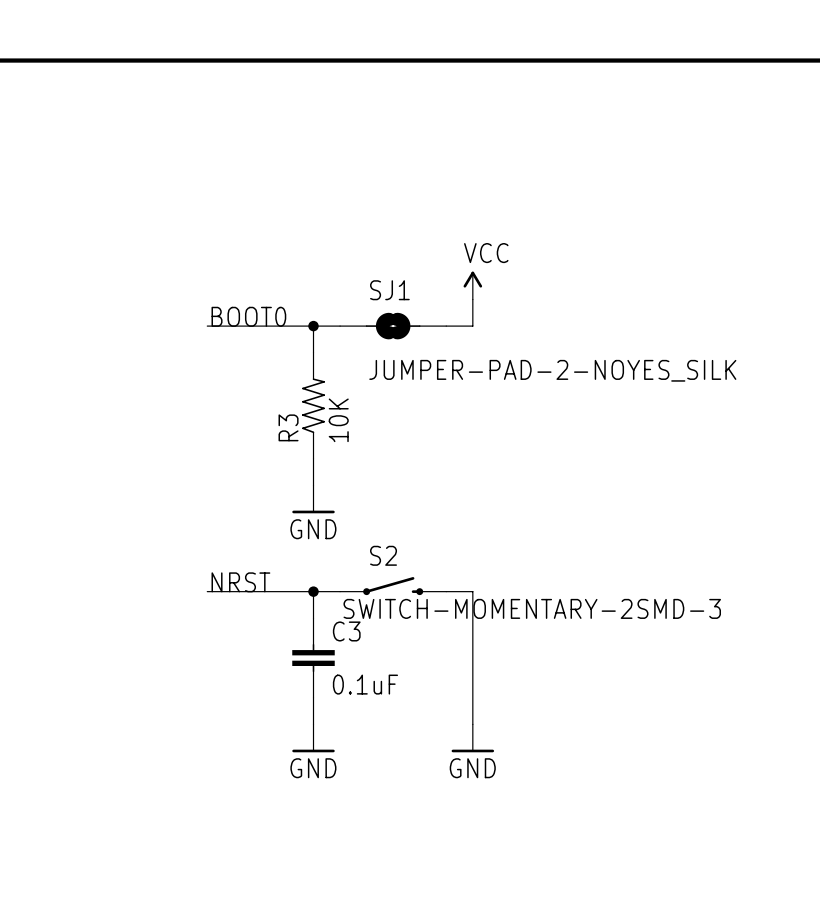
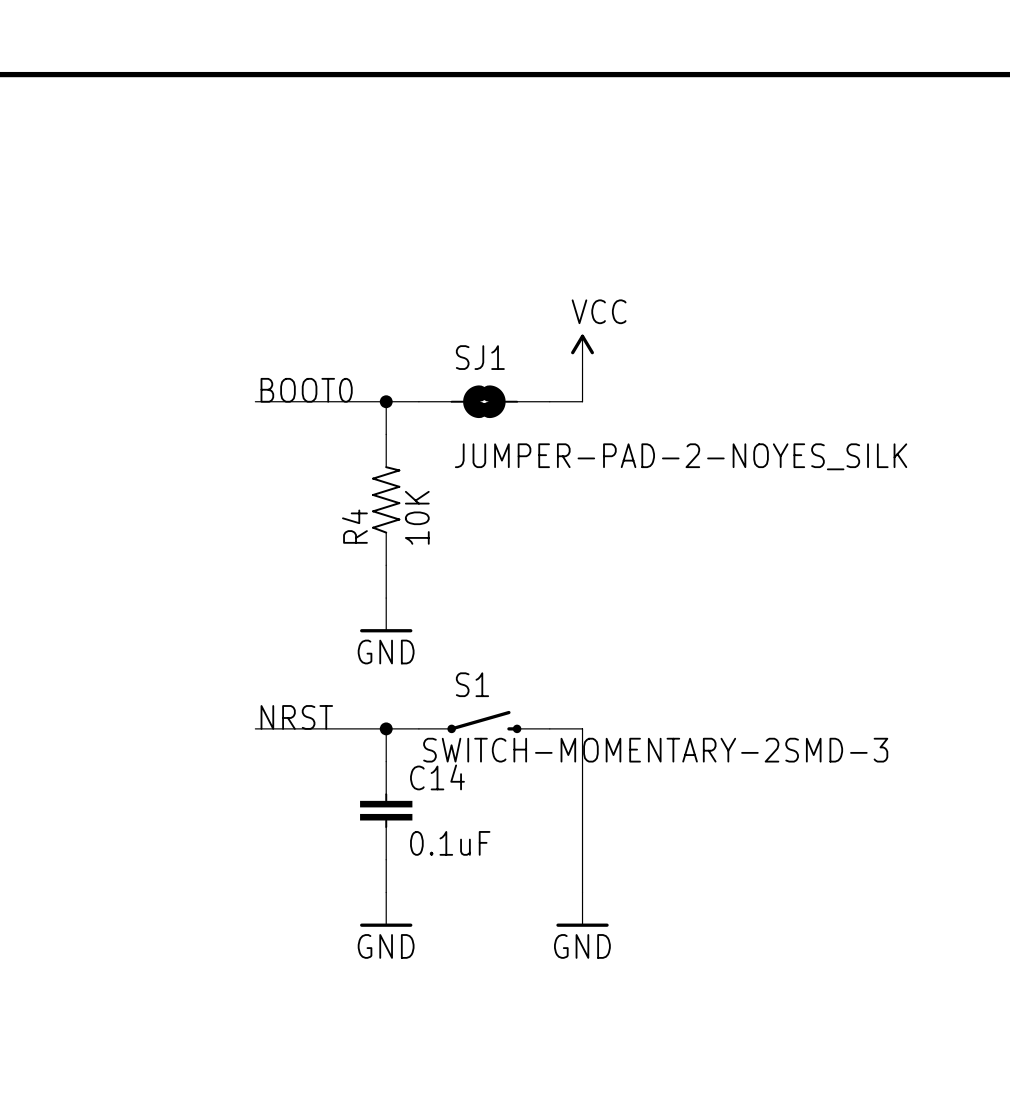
R3 name: R3 (288, 427) -> R4 (354, 526)
S2 name: S2 (383, 555) -> S1 (472, 684)
C3 name: C3 (346, 631) -> C14 (437, 777)

